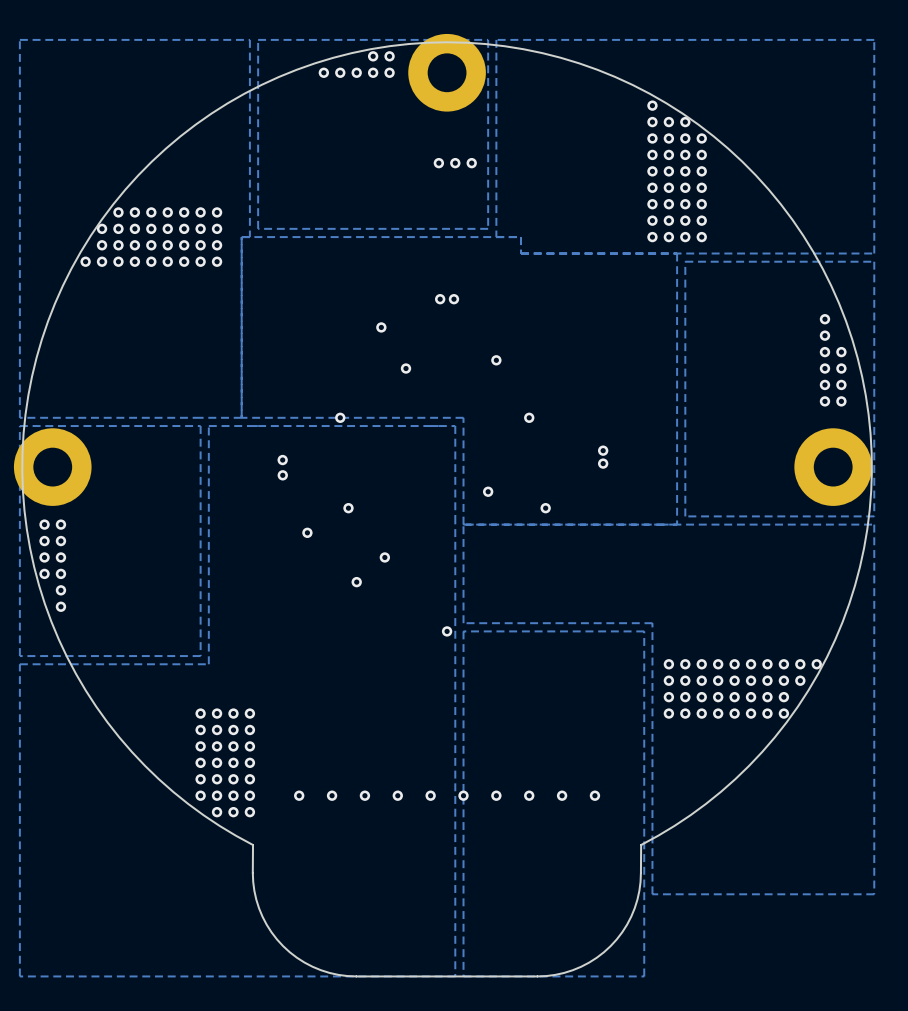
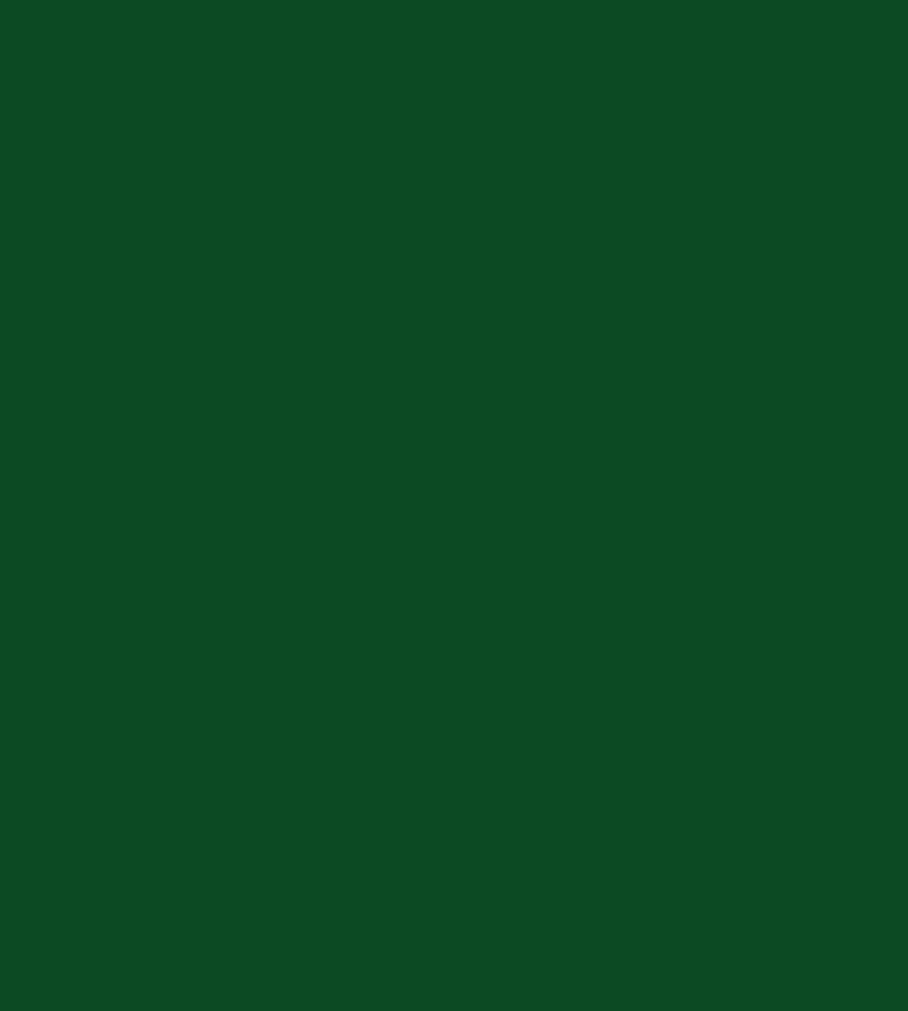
zone outline: (488, 39) (258, 39) (258, 228) (488, 228) (488, 39) -> none
via: (373, 56) -> none
via: (389, 56) -> none
via: (323, 72) -> none
via: (340, 72) -> none
via: (356, 72) -> none
via: (373, 72) -> none
via: (389, 72) -> none
part: (447, 72) -> none
via: (652, 105) -> none
via: (652, 122) -> none
via: (668, 122) -> none
via: (685, 122) -> none
via: (652, 138) -> none
via: (668, 138) -> none
via: (685, 138) -> none
via: (701, 138) -> none
via: (652, 154) -> none
via: (668, 154) -> none
via: (685, 154) -> none
via: (701, 154) -> none
via: (438, 163) -> none
via: (455, 163) -> none
via: (471, 163) -> none
via: (652, 171) -> none
via: (668, 171) -> none
via: (685, 171) -> none
via: (701, 171) -> none
via: (652, 187) -> none
via: (668, 187) -> none
via: (685, 187) -> none
via: (701, 187) -> none
via: (652, 204) -> none
via: (668, 204) -> none
via: (685, 204) -> none
via: (701, 204) -> none
via: (118, 212) -> none
via: (134, 212) -> none
via: (151, 212) -> none
via: (167, 212) -> none
via: (184, 212) -> none
via: (200, 212) -> none
via: (217, 212) -> none
via: (652, 220) -> none
via: (668, 220) -> none
via: (685, 220) -> none
via: (701, 220) -> none
via: (102, 228) -> none
via: (118, 228) -> none
via: (134, 228) -> none
via: (151, 228) -> none
via: (167, 228) -> none
via: (184, 228) -> none
via: (200, 228) -> none
via: (217, 228) -> none
zone outline: (249, 237) (249, 39) (19, 39) (19, 417) (463, 417) (463, 623) (652, 623) (652, 894) (874, 894) (874, 524) (463, 524) -> none
zone outline: (496, 237) (496, 39) (874, 39) (874, 253) (521, 253) (521, 237) (241, 237) (241, 417) -> none
via: (652, 237) -> none
via: (668, 237) -> none
via: (685, 237) -> none
via: (701, 237) -> none
via: (102, 245) -> none
via: (118, 245) -> none
via: (134, 245) -> none
via: (151, 245) -> none
via: (167, 245) -> none
via: (184, 245) -> none
via: (200, 245) -> none
via: (217, 245) -> none
zone outline: (677, 253) (677, 524) -> none
via: (85, 261) -> none
via: (102, 261) -> none
via: (118, 261) -> none
via: (134, 261) -> none
via: (151, 261) -> none
via: (167, 261) -> none
via: (184, 261) -> none
via: (200, 261) -> none
via: (217, 261) -> none
zone outline: (874, 261) (685, 261) (685, 516) (874, 516) (874, 261) -> none
via: (440, 299) -> none
via: (453, 299) -> none
via: (824, 319) -> none
via: (381, 327) -> none
via: (824, 335) -> none
via: (824, 352) -> none
via: (841, 352) -> none
via: (496, 360) -> none
via: (406, 368) -> none
via: (824, 368) -> none
via: (841, 368) -> none
via: (824, 384) -> none
via: (841, 384) -> none
via: (824, 401) -> none
via: (841, 401) -> none
via: (340, 417) -> none
via: (529, 417) -> none
zone outline: (200, 426) (200, 656) (19, 656) (19, 426) (200, 426) -> none
zone outline: (455, 426) (208, 426) (208, 664) (19, 664) (19, 976) (455, 976) (455, 426) -> none
via: (603, 450) -> none
via: (282, 460) -> none
via: (603, 463) -> none
part: (52, 467) -> none
part: (833, 467) -> none
via: (282, 475) -> none
via: (488, 491) -> none
via: (348, 508) -> none
via: (545, 508) -> none
via: (44, 524) -> none
via: (60, 524) -> none
via: (307, 532) -> none
via: (44, 541) -> none
via: (60, 541) -> none
via: (44, 557) -> none
via: (60, 557) -> none
via: (384, 557) -> none
via: (44, 573) -> none
via: (60, 573) -> none
via: (356, 582) -> none
via: (60, 590) -> none
via: (60, 606) -> none
via: (447, 631) -> none
zone outline: (644, 631) (463, 631) (463, 976) (644, 976) (644, 631) -> none
via: (668, 664) -> none
via: (685, 664) -> none
via: (701, 664) -> none
via: (718, 664) -> none
via: (734, 664) -> none
via: (751, 664) -> none
via: (767, 664) -> none
via: (783, 664) -> none
via: (800, 664) -> none
via: (816, 664) -> none
via: (668, 680) -> none
via: (685, 680) -> none
via: (701, 680) -> none
via: (718, 680) -> none
via: (734, 680) -> none
via: (751, 680) -> none
via: (767, 680) -> none
via: (783, 680) -> none
via: (800, 680) -> none
via: (668, 697) -> none
via: (685, 697) -> none
via: (701, 697) -> none
via: (718, 697) -> none
via: (734, 697) -> none
via: (751, 697) -> none
via: (767, 697) -> none
via: (783, 697) -> none
via: (200, 713) -> none
via: (217, 713) -> none
via: (233, 713) -> none
via: (249, 713) -> none
via: (668, 713) -> none
via: (685, 713) -> none
via: (701, 713) -> none
via: (718, 713) -> none
via: (734, 713) -> none
via: (751, 713) -> none
via: (767, 713) -> none
via: (783, 713) -> none
via: (200, 729) -> none
via: (217, 729) -> none
via: (233, 729) -> none
via: (249, 729) -> none
via: (200, 746) -> none
via: (217, 746) -> none
via: (233, 746) -> none
via: (249, 746) -> none
via: (200, 762) -> none
via: (217, 762) -> none
via: (233, 762) -> none
via: (249, 762) -> none
via: (200, 779) -> none
via: (217, 779) -> none
via: (233, 779) -> none
via: (249, 779) -> none
via: (200, 795) -> none
via: (217, 795) -> none
via: (233, 795) -> none
via: (249, 795) -> none
via: (299, 795) -> none
via: (332, 795) -> none
via: (364, 795) -> none
via: (397, 795) -> none
via: (430, 795) -> none
via: (463, 795) -> none
via: (496, 795) -> none
via: (529, 795) -> none
via: (562, 795) -> none
via: (594, 795) -> none
via: (217, 812) -> none
via: (233, 812) -> none
via: (249, 812) -> none
board edge: (641, 845) (639, 890) (634, 908) (627, 924) (616, 939) (603, 952) (589, 962) (572, 970) (555, 974) (537, 976) (356, 976) (338, 974) (320, 970) (304, 962) (289, 952) (277, 939) (266, 924) (259, 908) (254, 890) (253, 845) (203, 815) (173, 791) (145, 765) (119, 737) (96, 706) (67, 657) (51, 621) (34, 567) (26, 529) (22, 491) (22, 452) (25, 414) (32, 376) (41, 339) (55, 303) (71, 268) (90, 235) (125, 189) (151, 161) (180, 136) (211, 113) (261, 84) (296, 69) (333, 57) (370, 49) (408, 44) (447, 42) (485, 44) (542, 53) (579, 63) (615, 76) (649, 93) (682, 113) (713, 136) (755, 175) (780, 204) (803, 235) (822, 268) (839, 303) (852, 339) (862, 376) (868, 414) (871, 471) (869, 510) (864, 548) (855, 585) (842, 621) (827, 657) (797, 706) (774, 737) (749, 765) (720, 791) (674, 825) (641, 845) -> none

